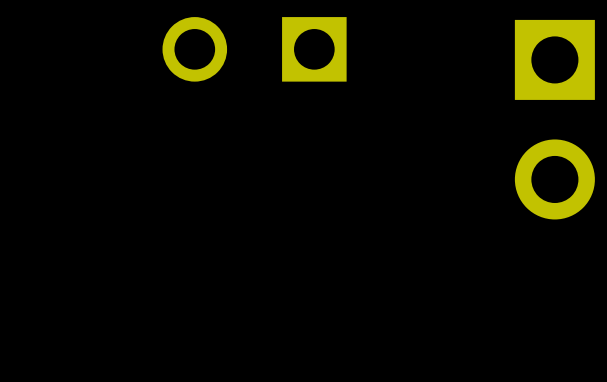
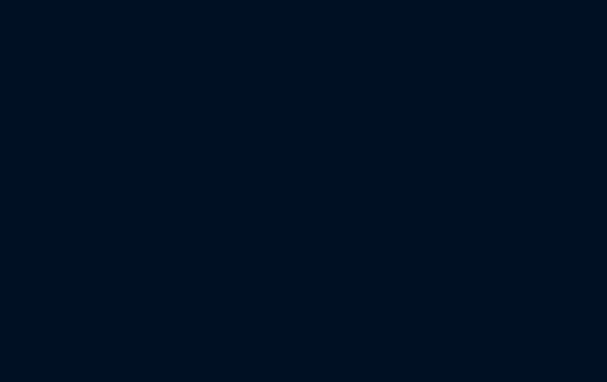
part: (254, 49) -> none
part: (554, 119) -> none

